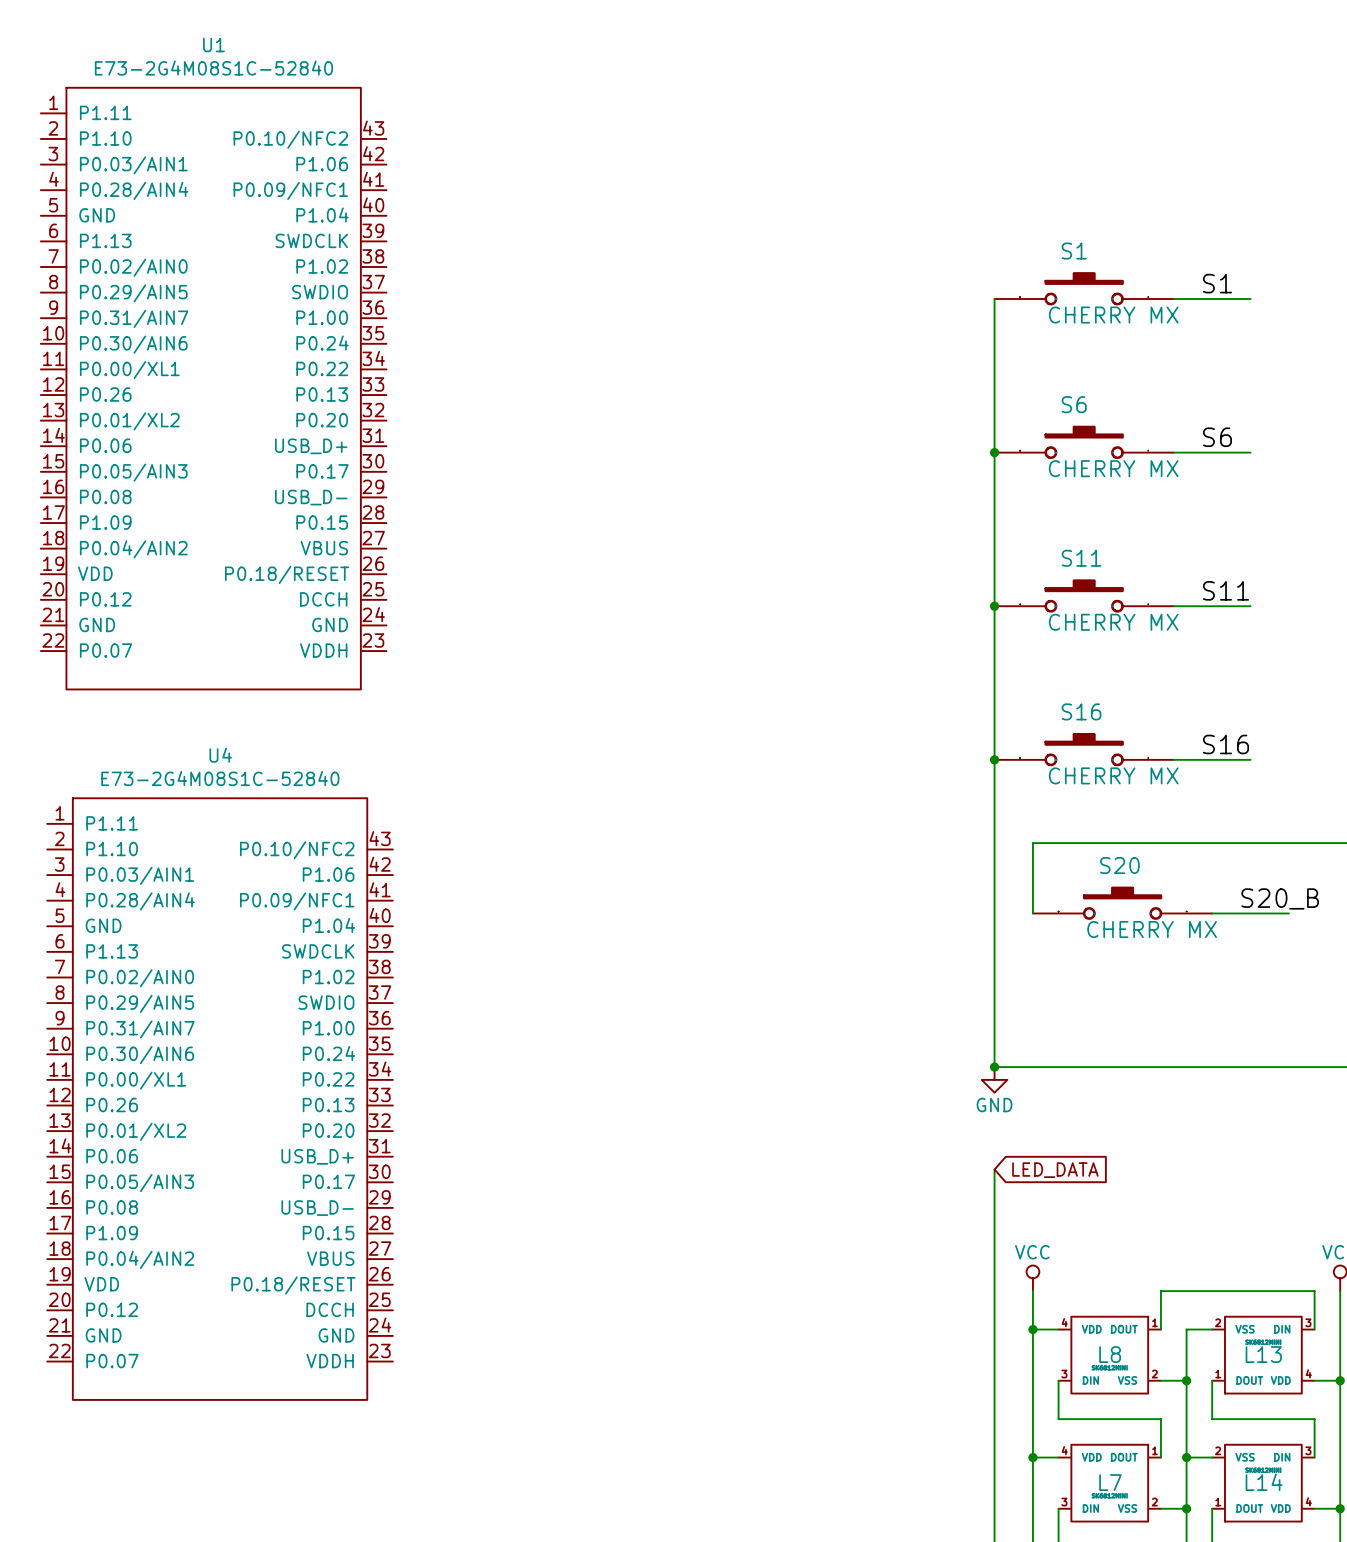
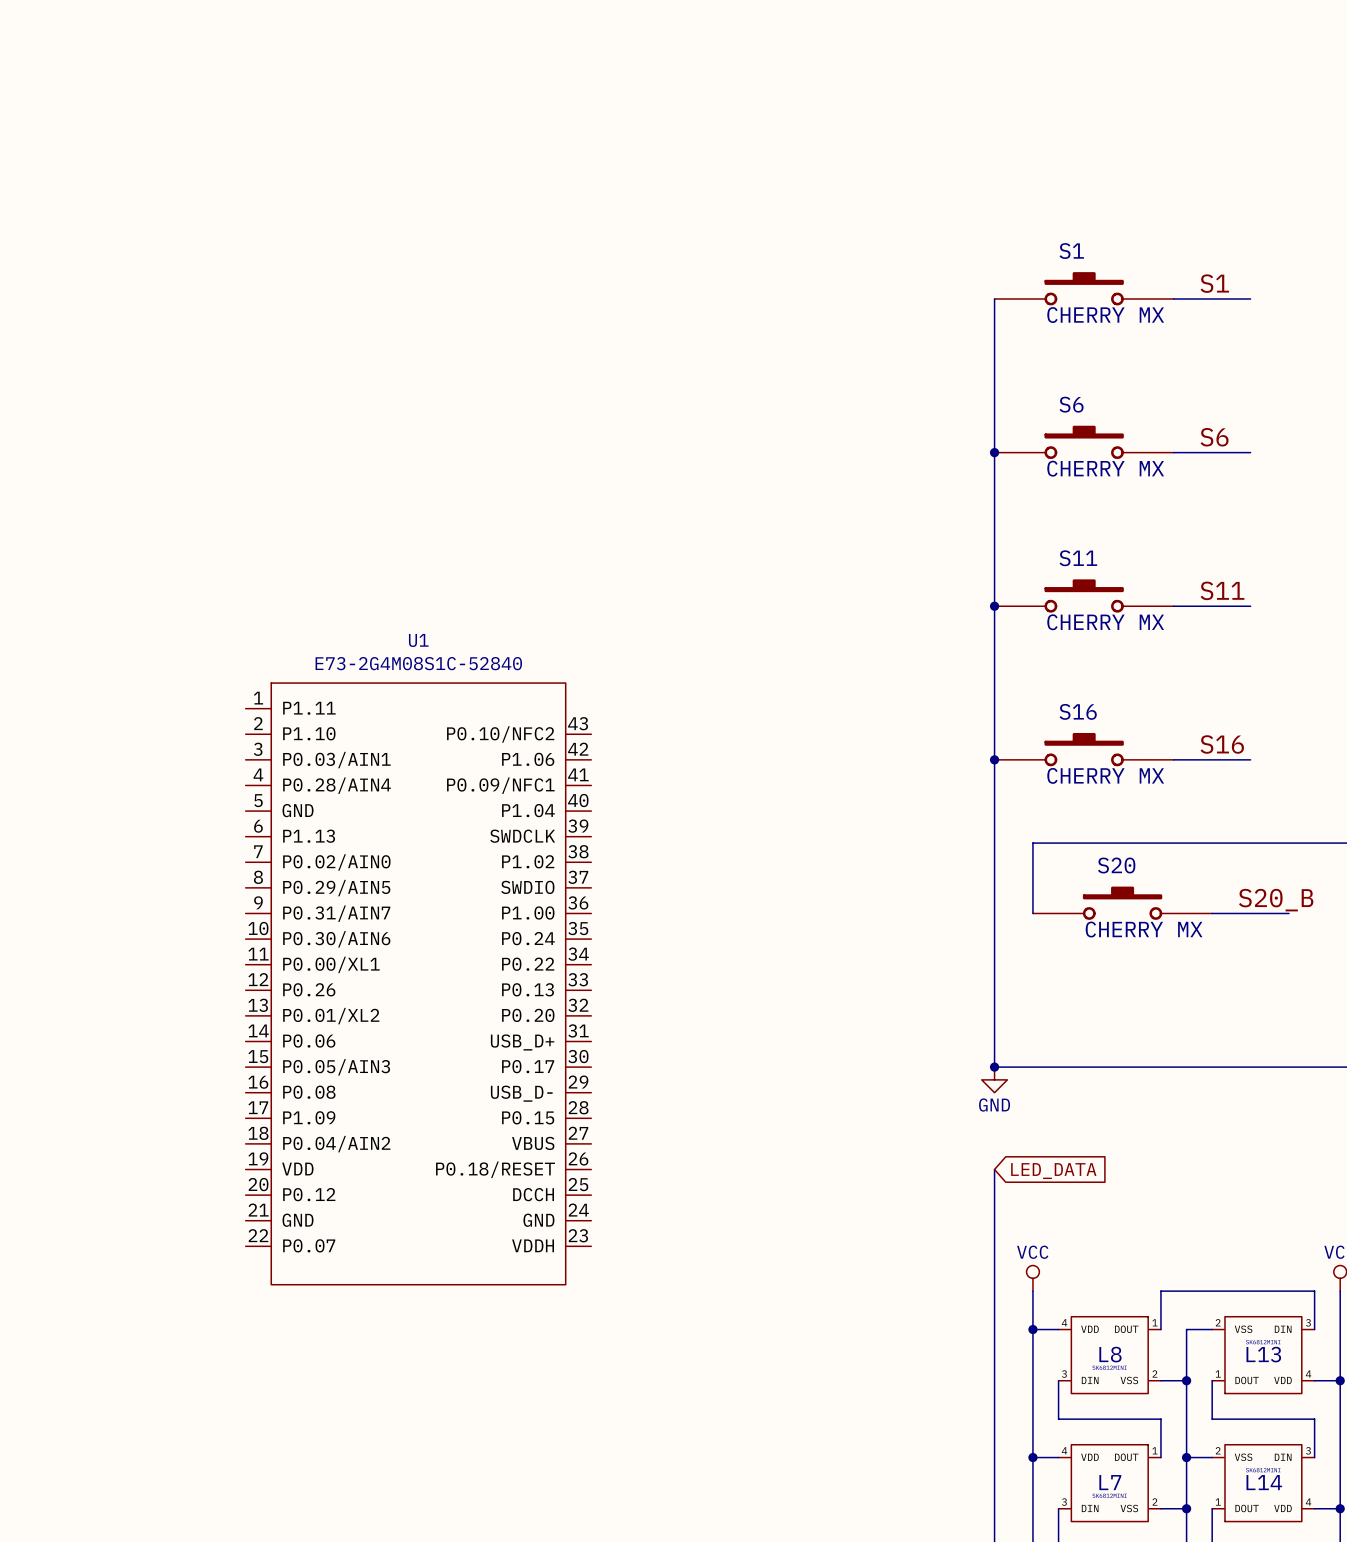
U1 position: (213, 388) -> (418, 983)
U4: E73-2G4M08S1C-52840 (220, 1099) -> none

